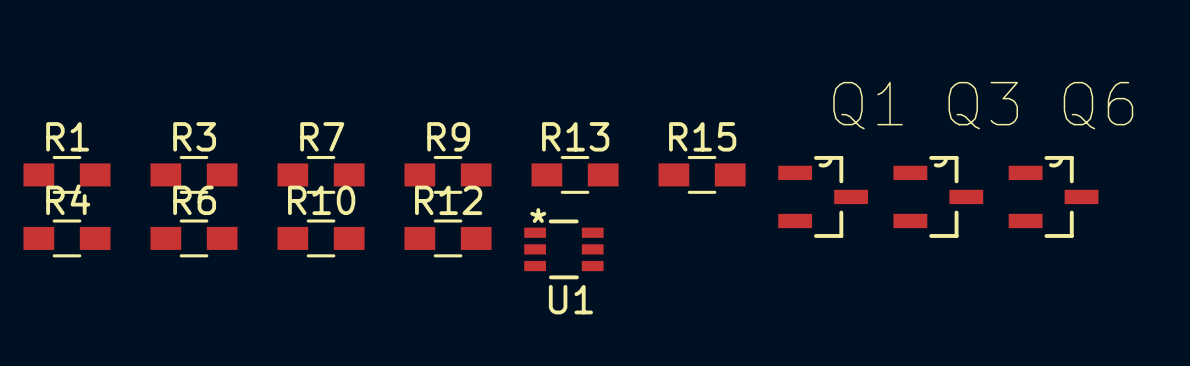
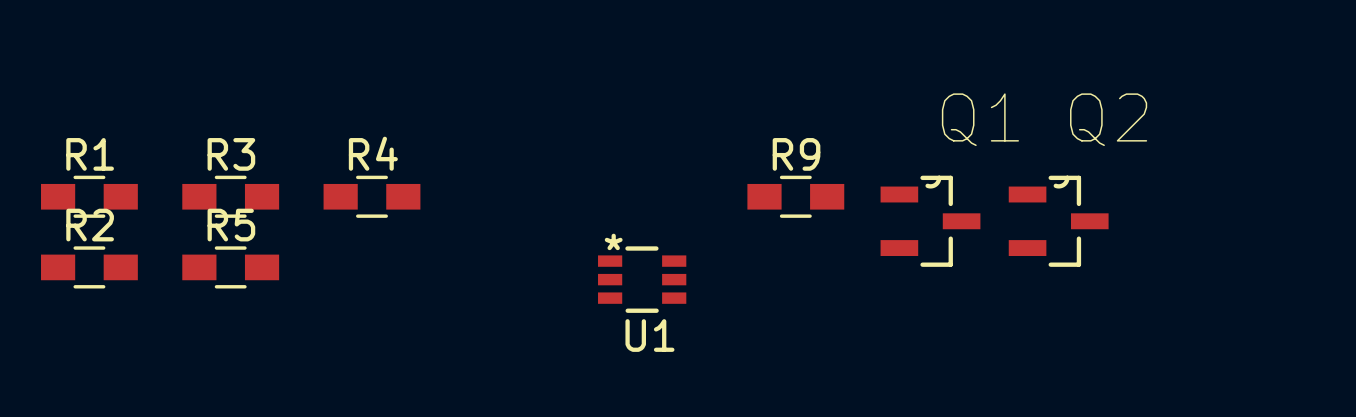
Q3 name: Q3 (983, 105) -> Q2 (1108, 119)
R7 name: R7 (322, 136) -> R4 (373, 153)
R15 name: R15 (702, 136) -> R9 (796, 154)
R9: (448, 174) -> none
R13: (575, 174) -> none
Q6: (1053, 196) -> none
R4 name: R4 (68, 199) -> R2 (90, 225)
R6 name: R6 (194, 200) -> R5 (231, 225)
R10: (321, 238) -> none
R12: (448, 238) -> none

